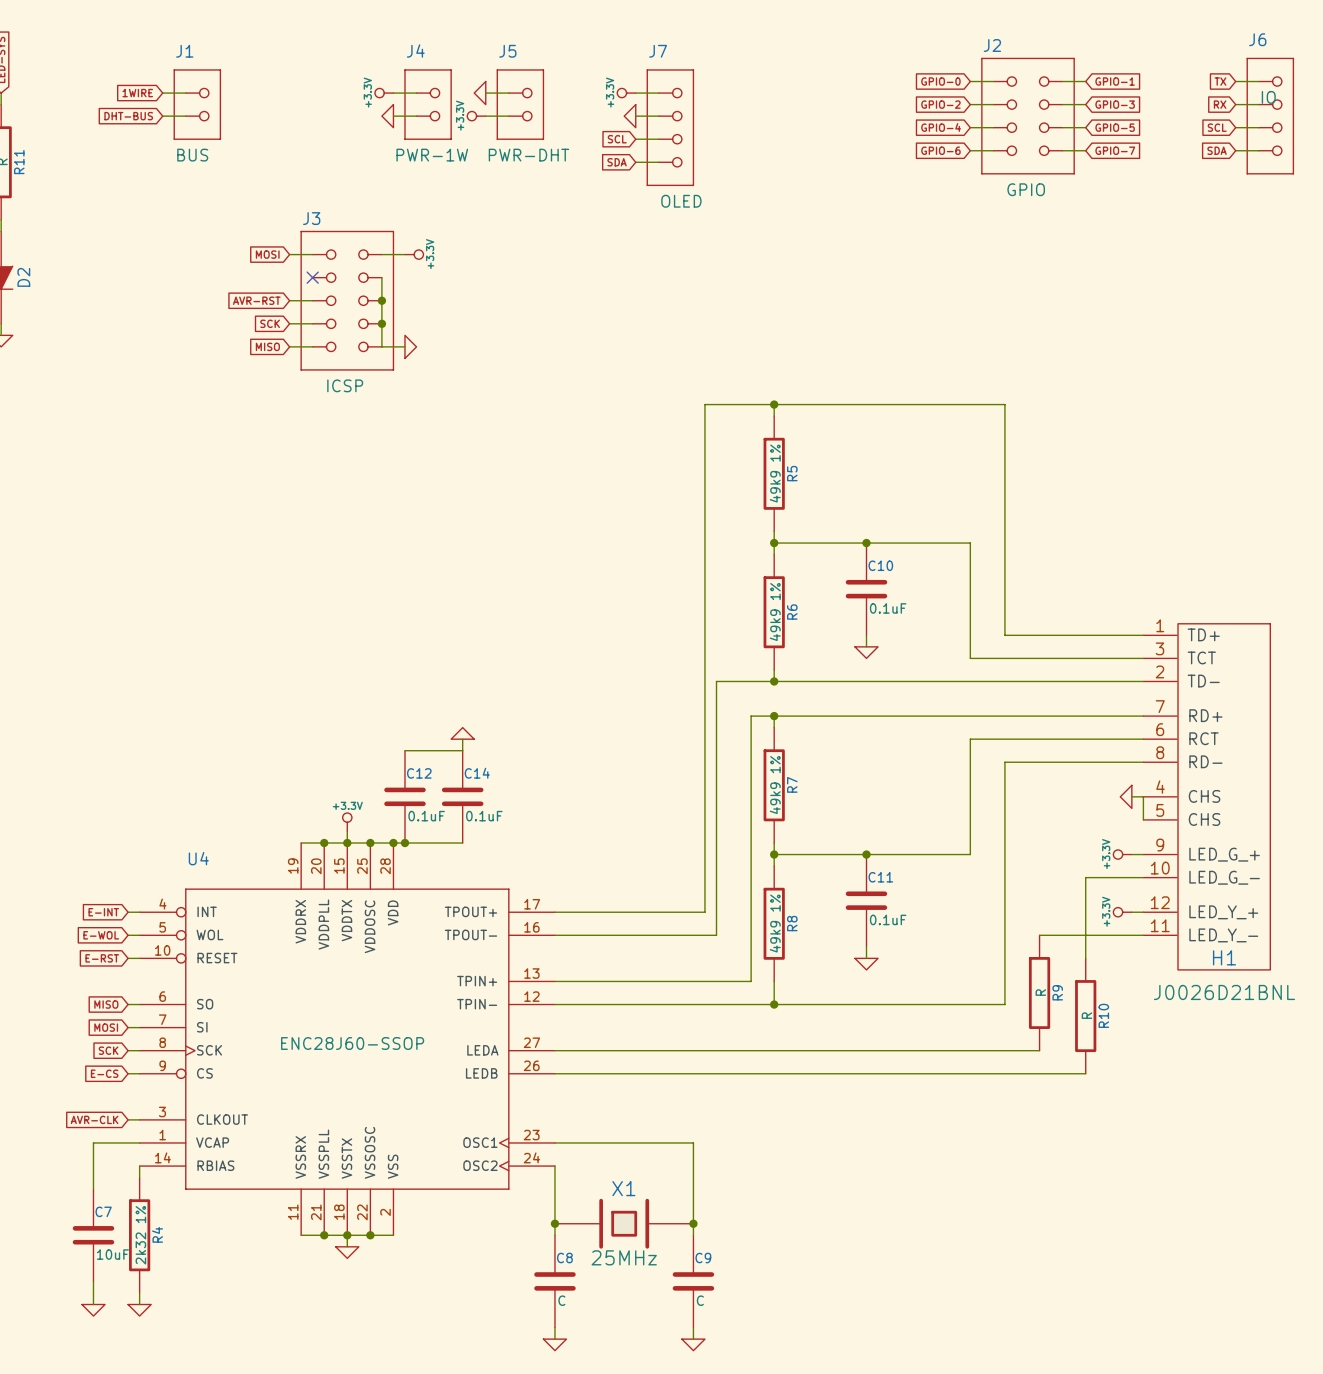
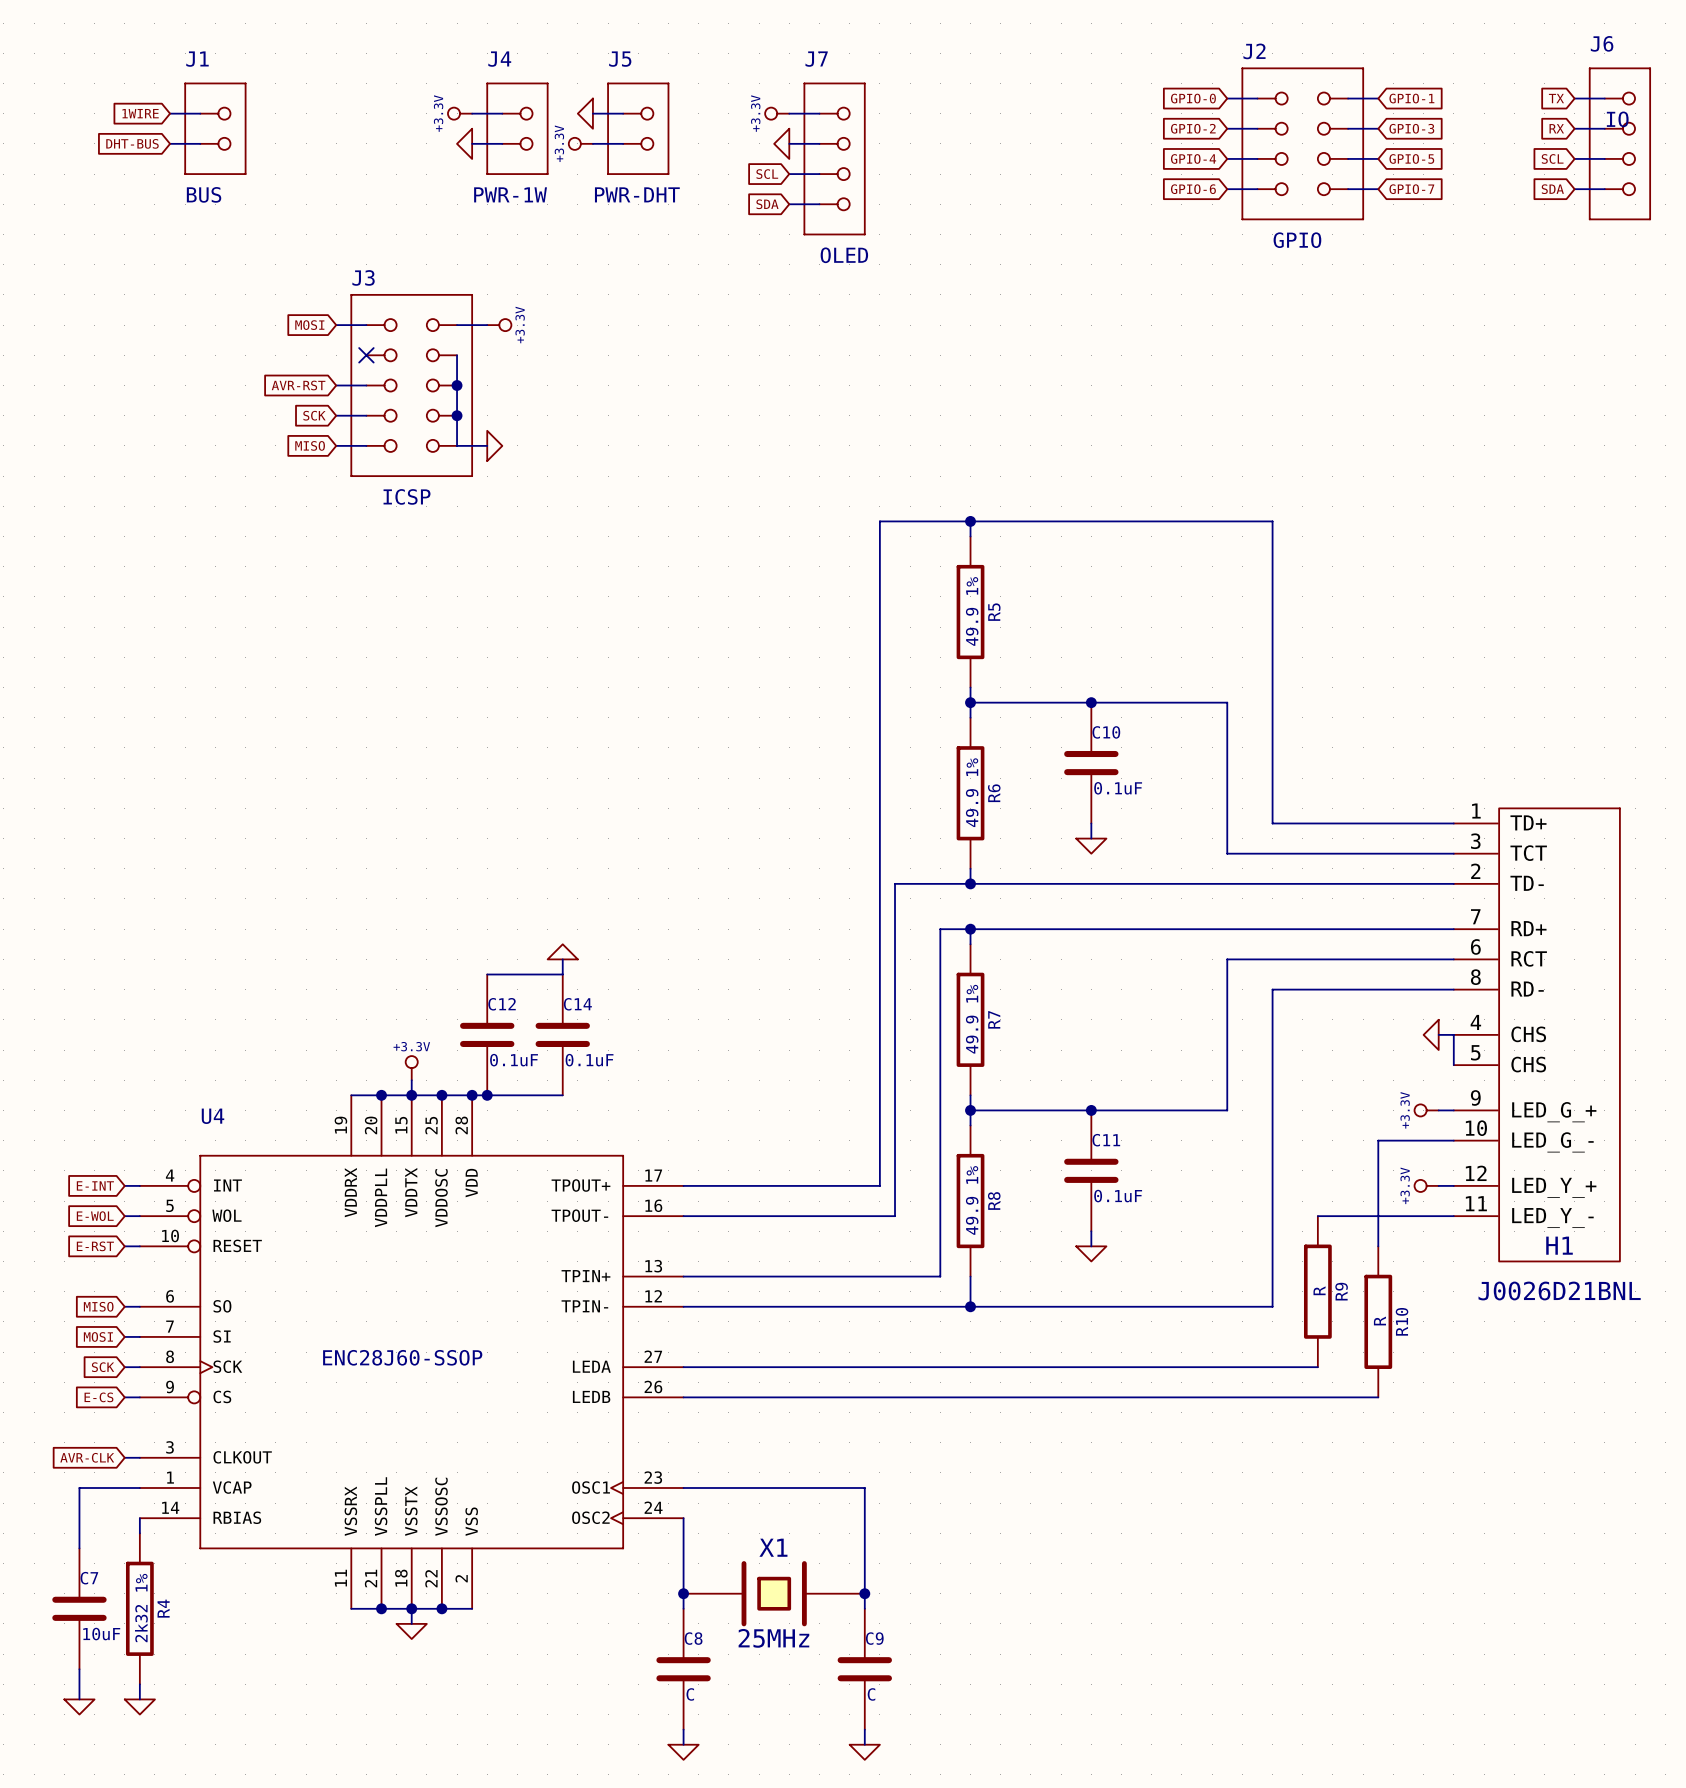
R5 value: 49k9 1% (775, 473) -> 49.9 1% (972, 611)
R6 value: 49k9 1% (775, 612) -> 49.9 1% (972, 792)
R7 value: 49k9 1% (775, 785) -> 49.9 1% (972, 1019)
R8 value: 49k9 1% (775, 923) -> 49.9 1% (972, 1200)

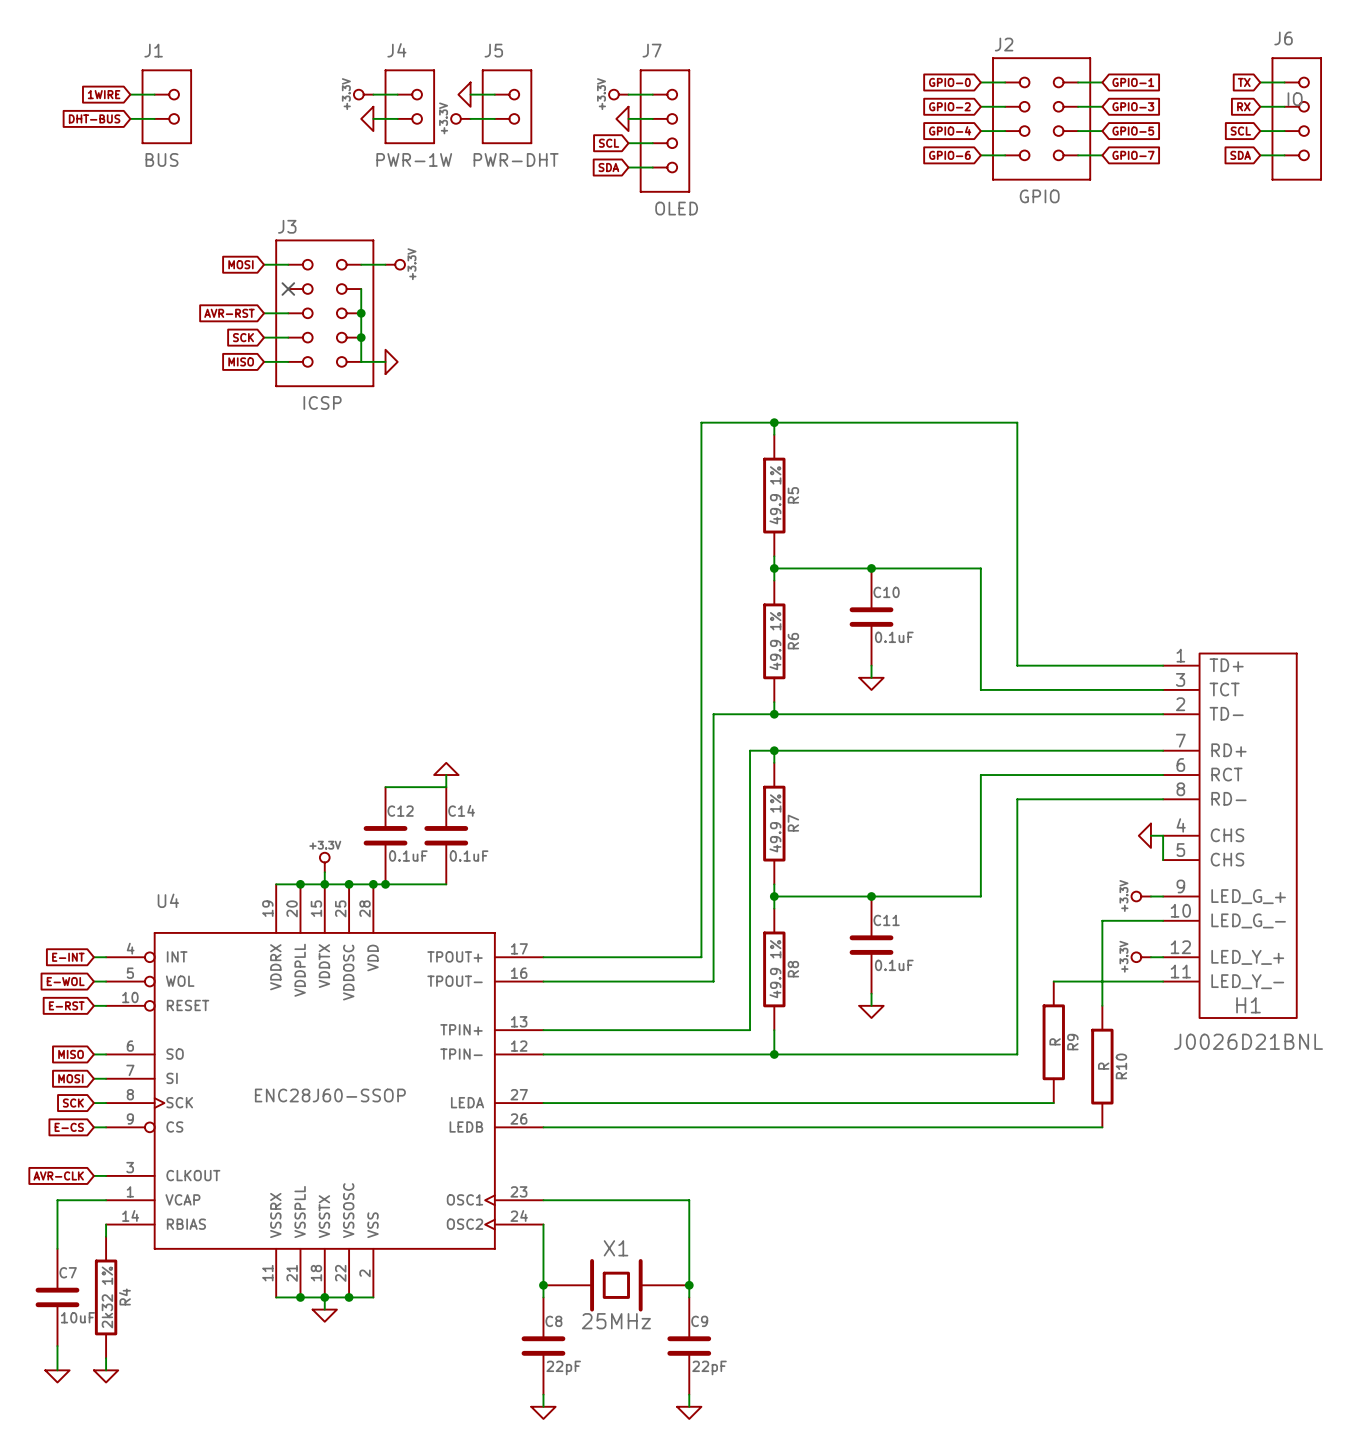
C8 value: C (690, 1694) -> 22pF (563, 1367)
C9 value: C (871, 1694) -> 22pF (709, 1367)

